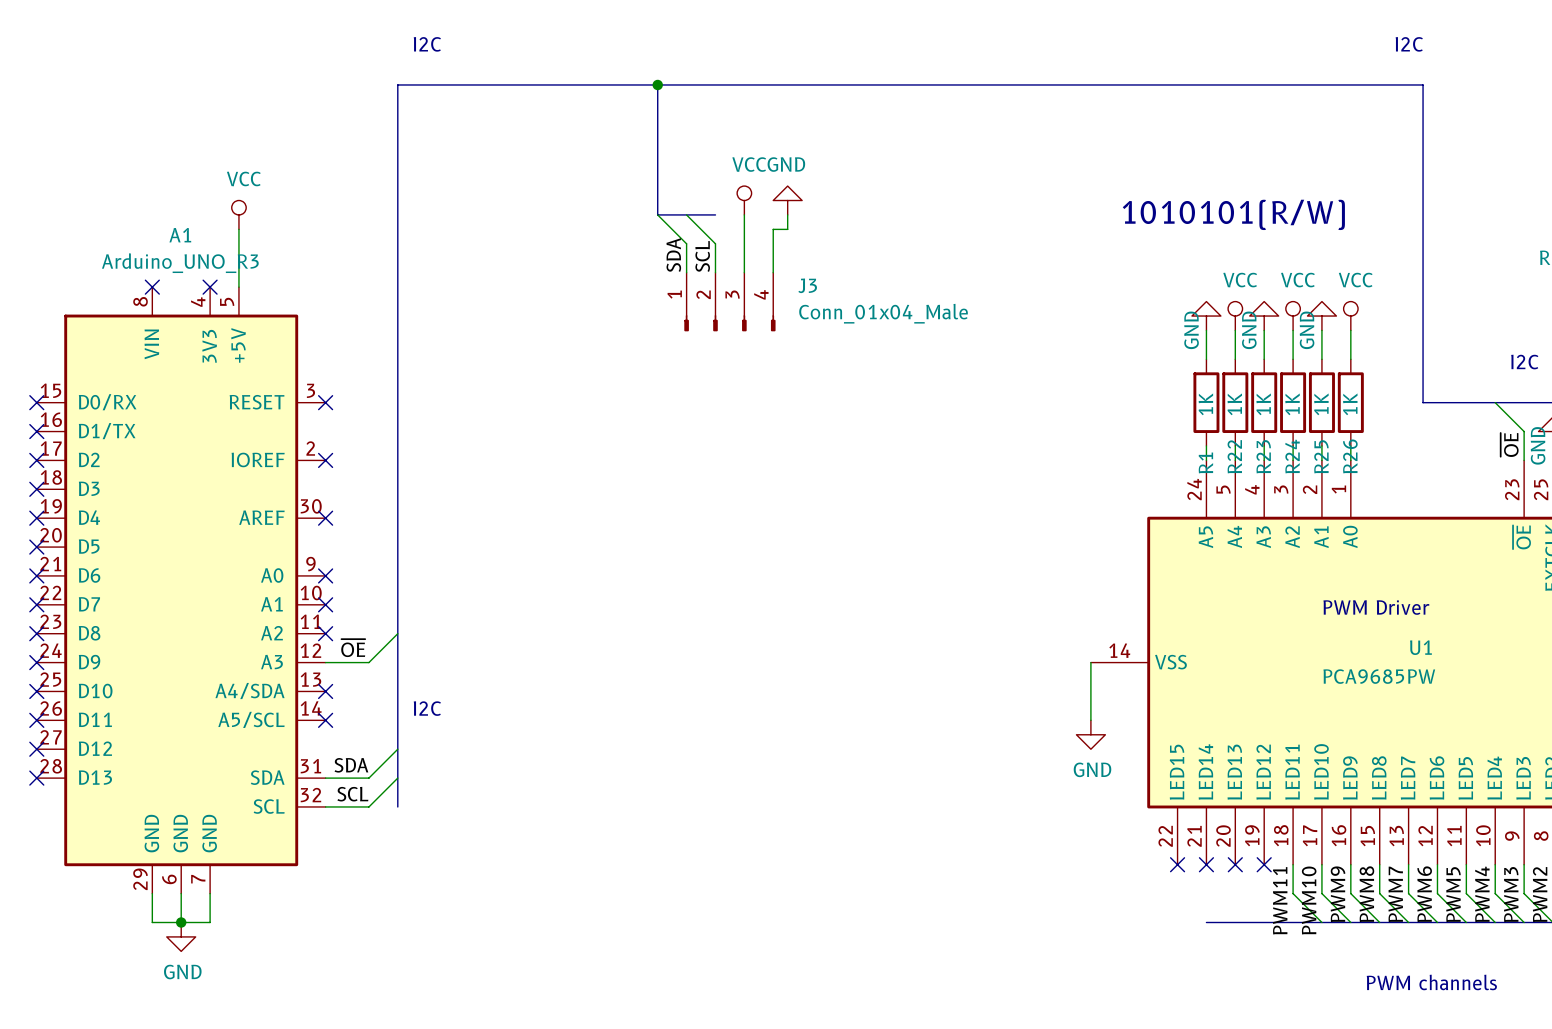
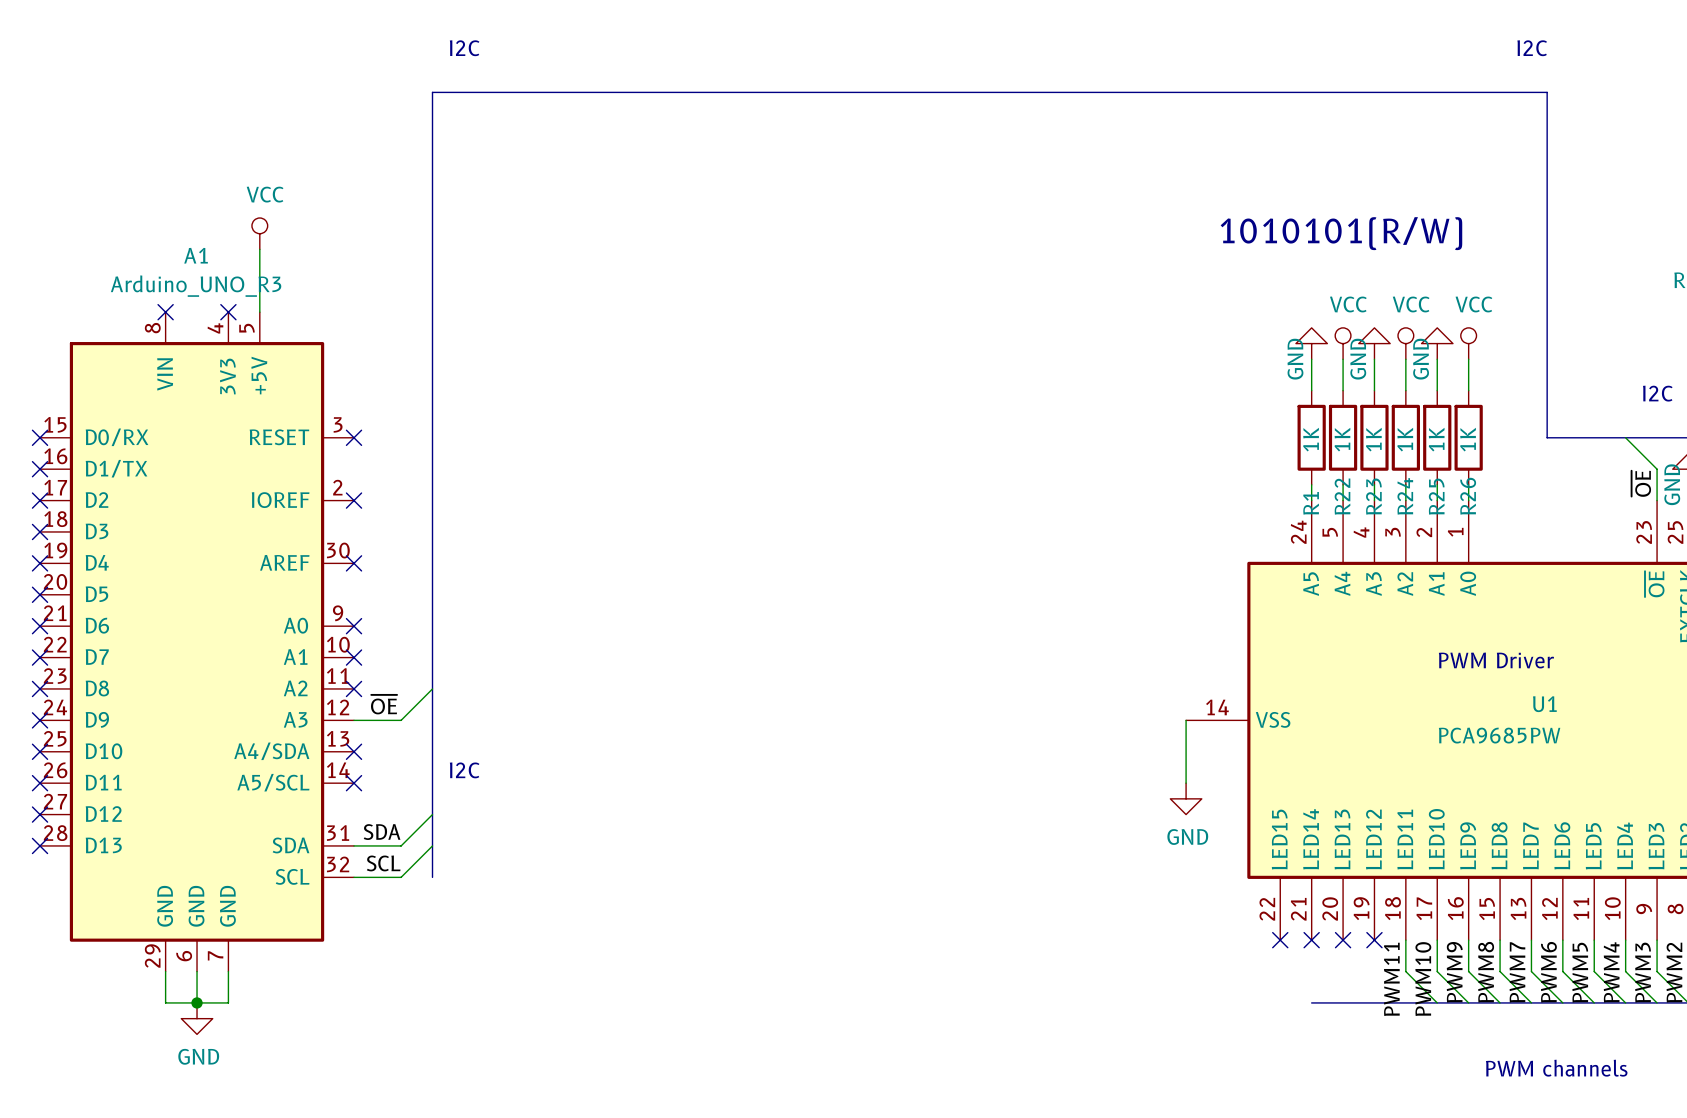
bus: (657, 84) (657, 214) (715, 214) -> none
junction: (657, 84) -> none
power symbol: VCC (744, 200) -> none
power symbol: GND (787, 200) -> none
wire: (657, 214) (686, 243) (686, 272) -> none
wire: (686, 214) (715, 243) (715, 272) -> none
wire: (744, 214) (744, 272) -> none
wire: (787, 214) (787, 229) (773, 229) (773, 272) -> none
label: SDA (673, 255) -> none
label: SCL (702, 256) -> none
J3: Conn_01x04_Male (729, 302) -> none

